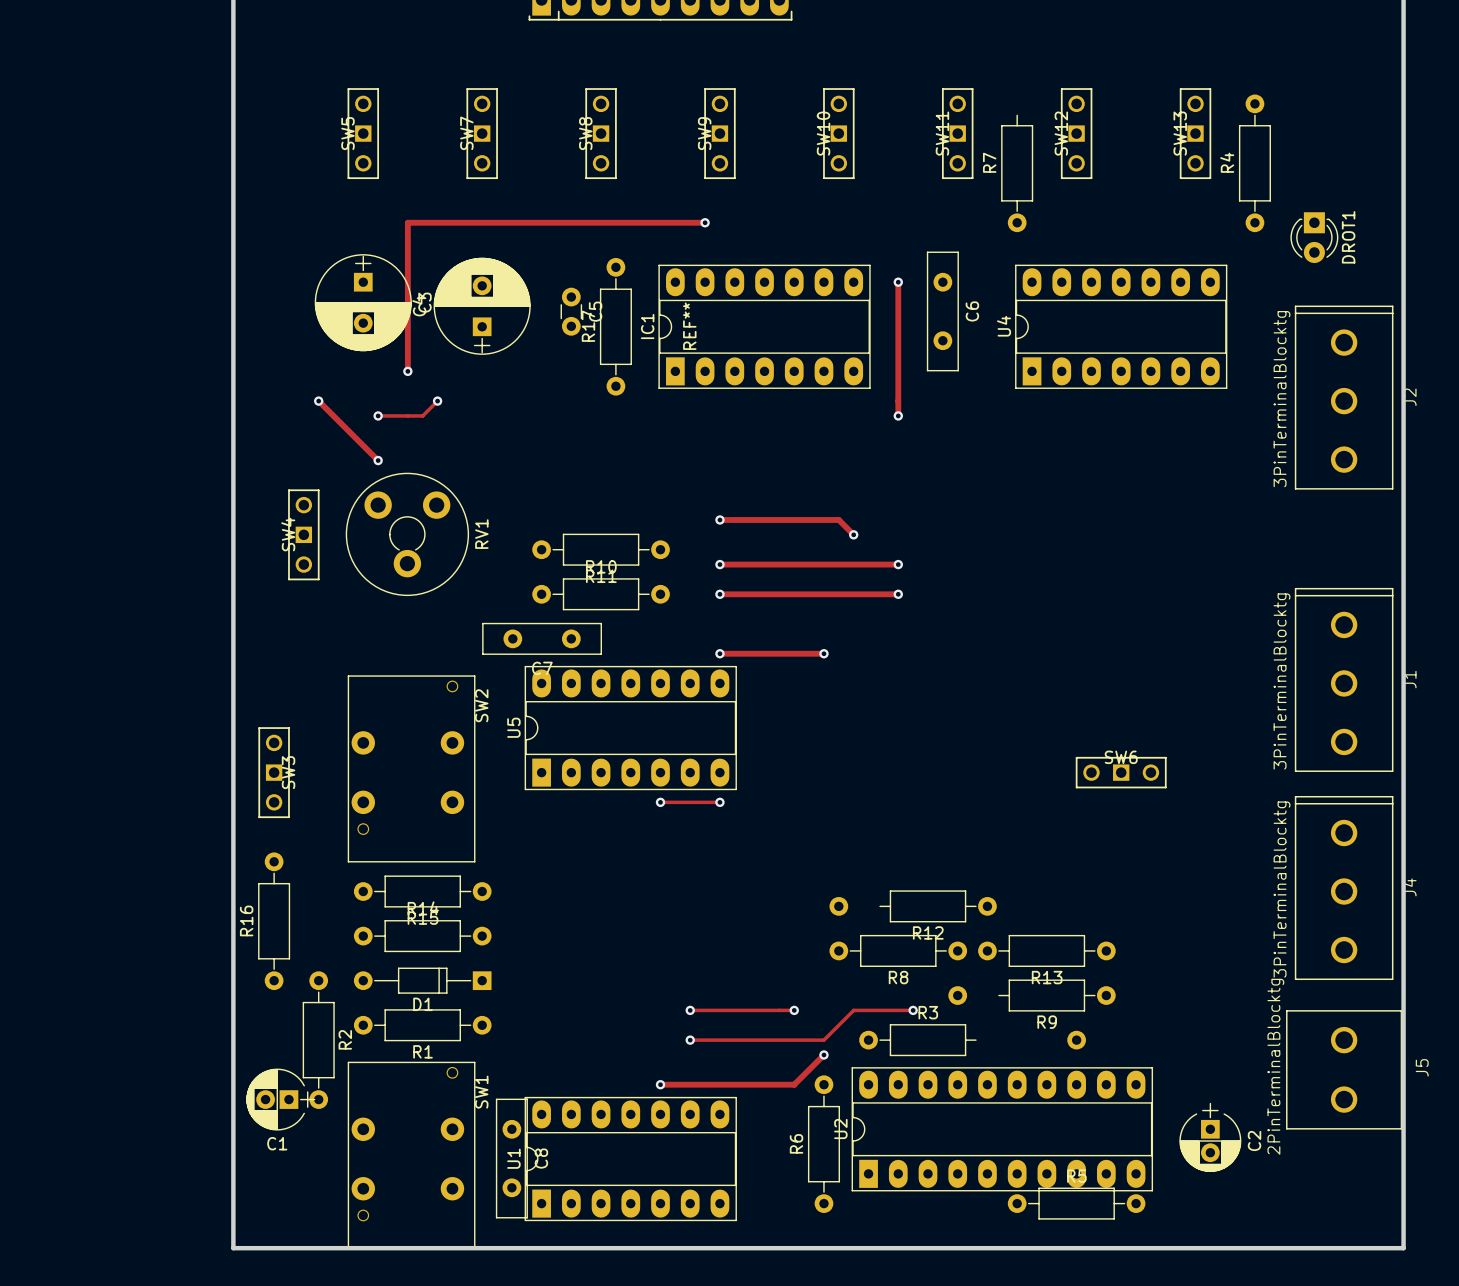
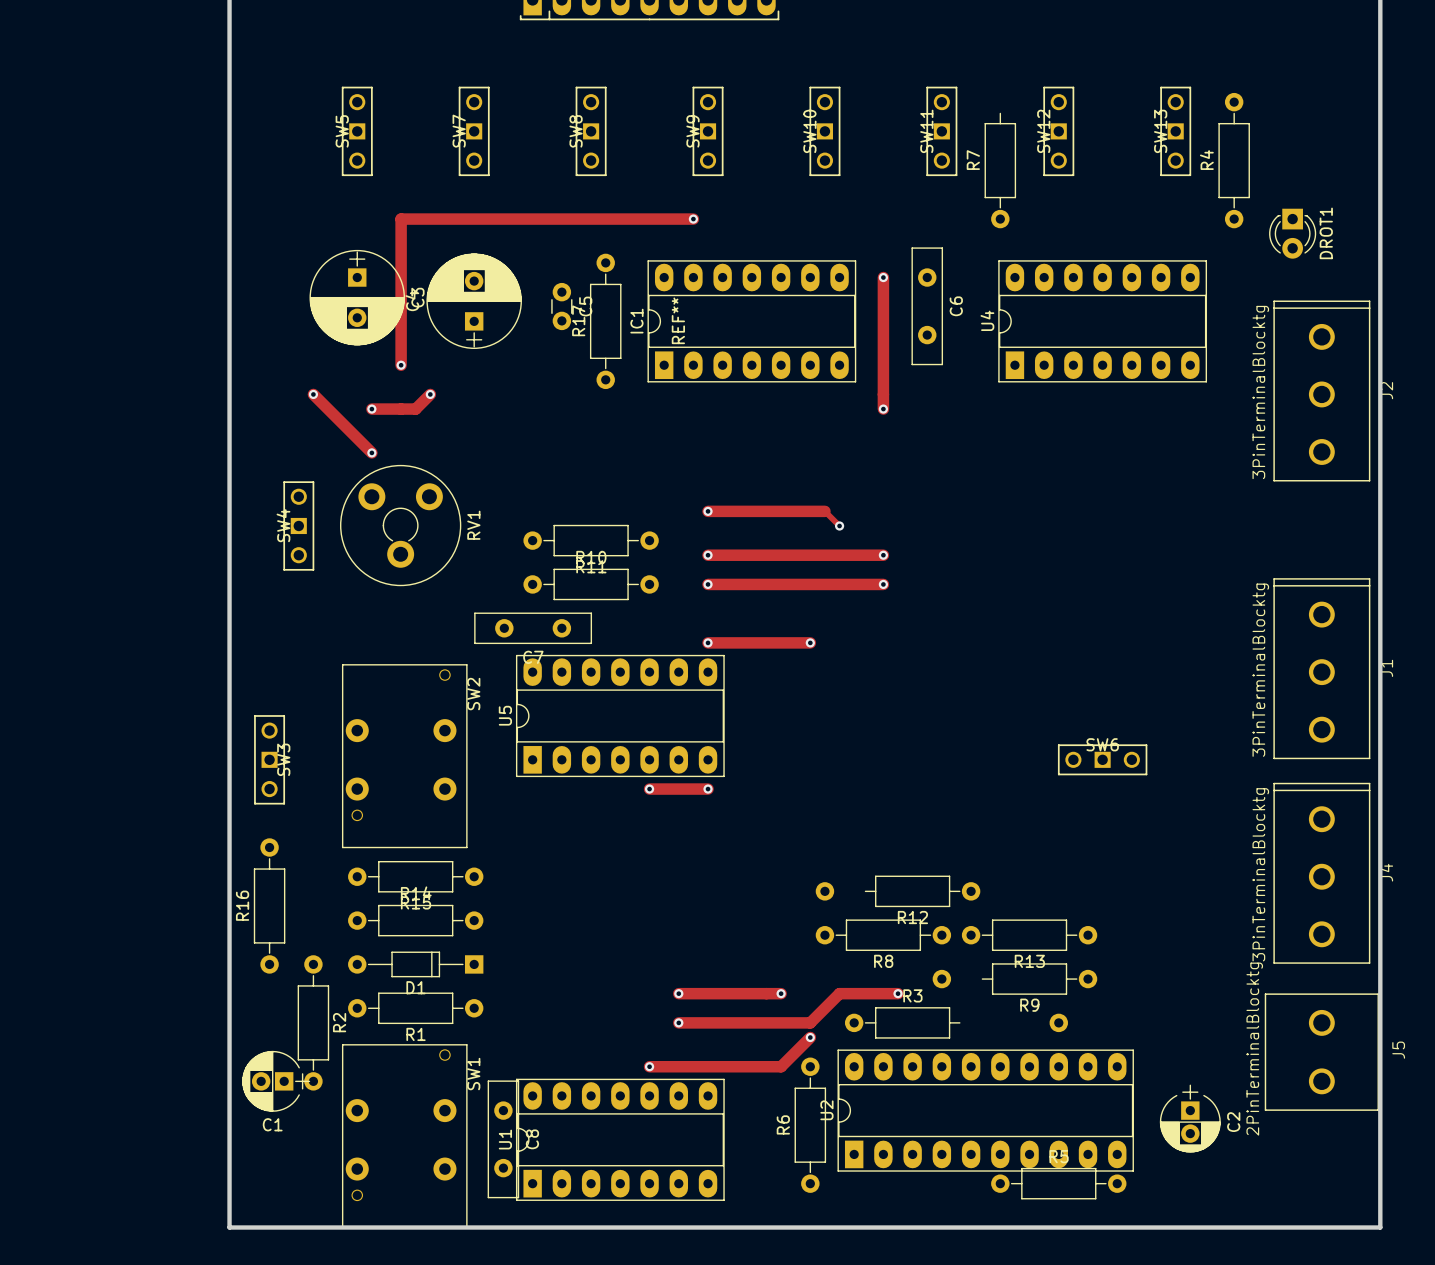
track width: thin (705, 222) (407, 222) (407, 371) -> thick (693, 219) (401, 219) (401, 365)
track width: thin (898, 282) (898, 415) -> thick (883, 277) (883, 409)
track width: thin (318, 401) (378, 460) -> thick (313, 394) (371, 452)
track width: thin (437, 401) (422, 415) (378, 415) -> thick (430, 394) (415, 409) (371, 409)
track width: thin (719, 519) (838, 519) -> thick (708, 511) (824, 511)
track width: thin (719, 564) (898, 564) -> thick (708, 555) (883, 555)
track width: thin (719, 594) (898, 594) -> thick (708, 584) (883, 584)
track width: thin (719, 653) (823, 653) -> thick (708, 642) (810, 642)
track width: thin (660, 802) (719, 802) -> thick (649, 789) (708, 789)
track width: thin (690, 1010) (794, 1010) -> thick (678, 993) (781, 993)
track width: thin (913, 1010) (853, 1010) (823, 1040) (690, 1040) -> thick (898, 993) (839, 993) (810, 1022) (678, 1022)
track width: thin (823, 1054) (794, 1084) (660, 1084) -> thick (810, 1037) (781, 1066) (649, 1066)

